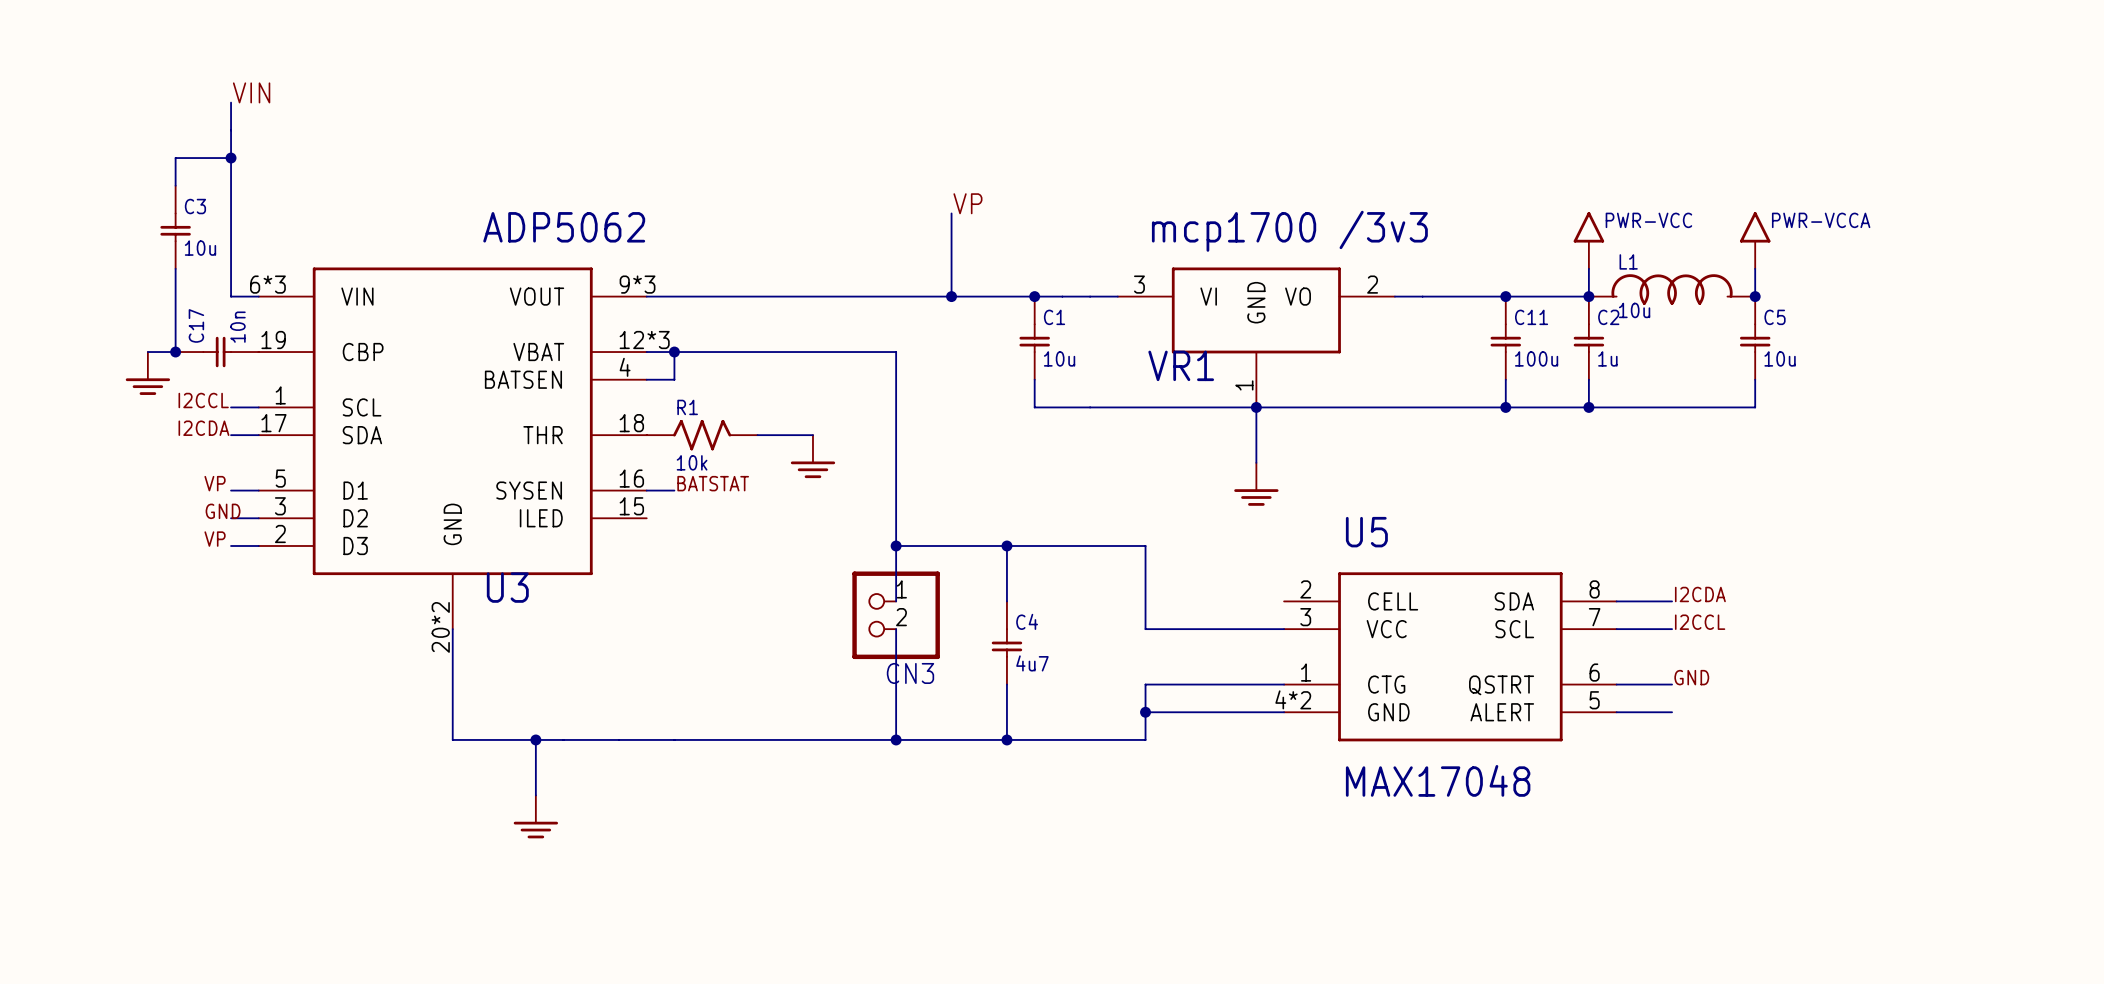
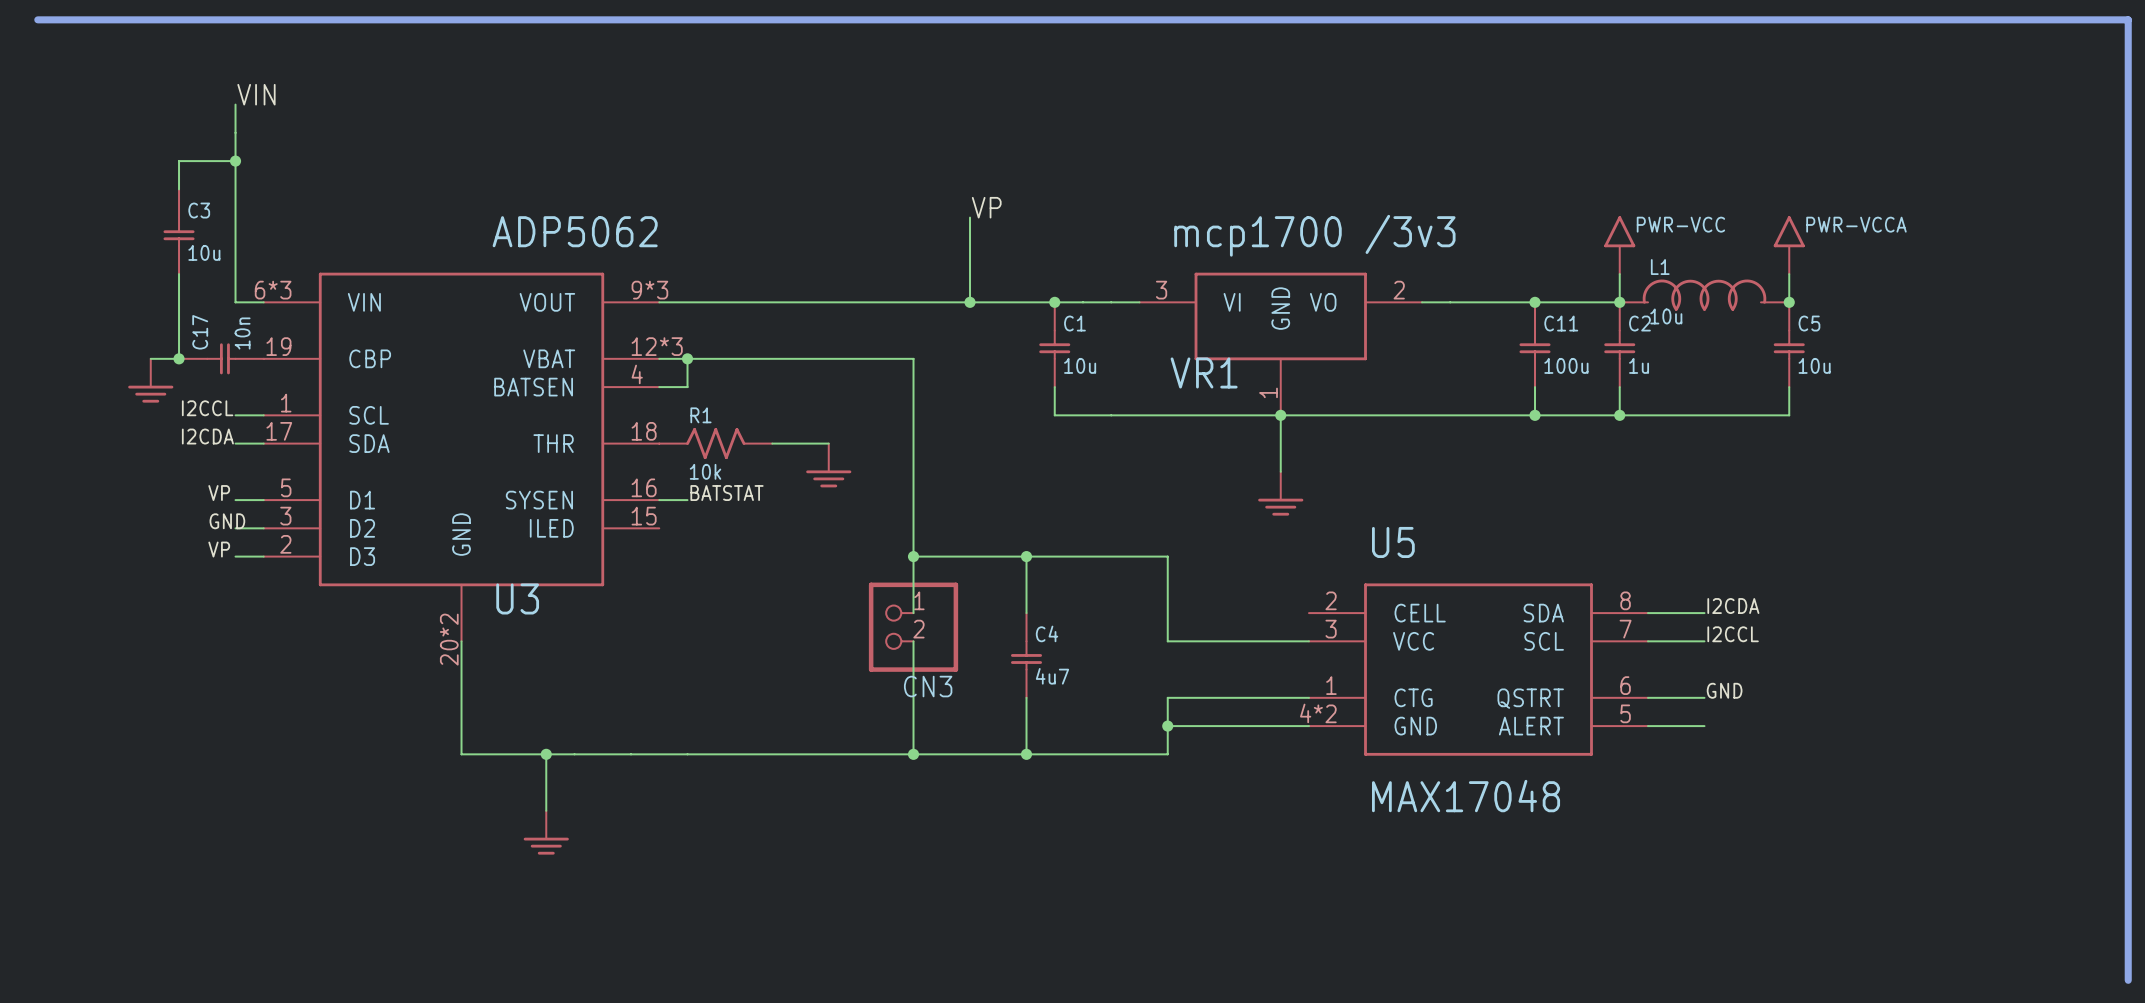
line: none -> (37, 19) (2128, 19) (2128, 980)

